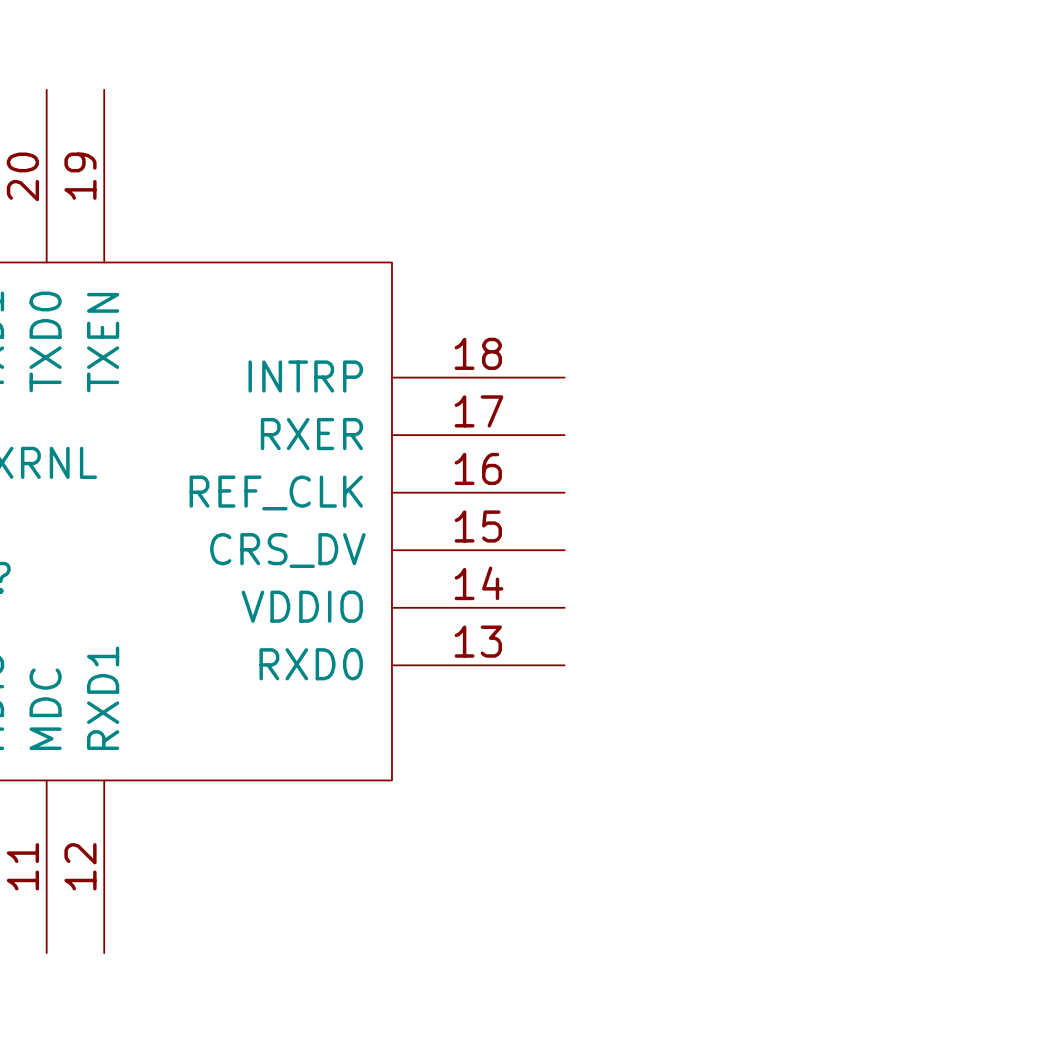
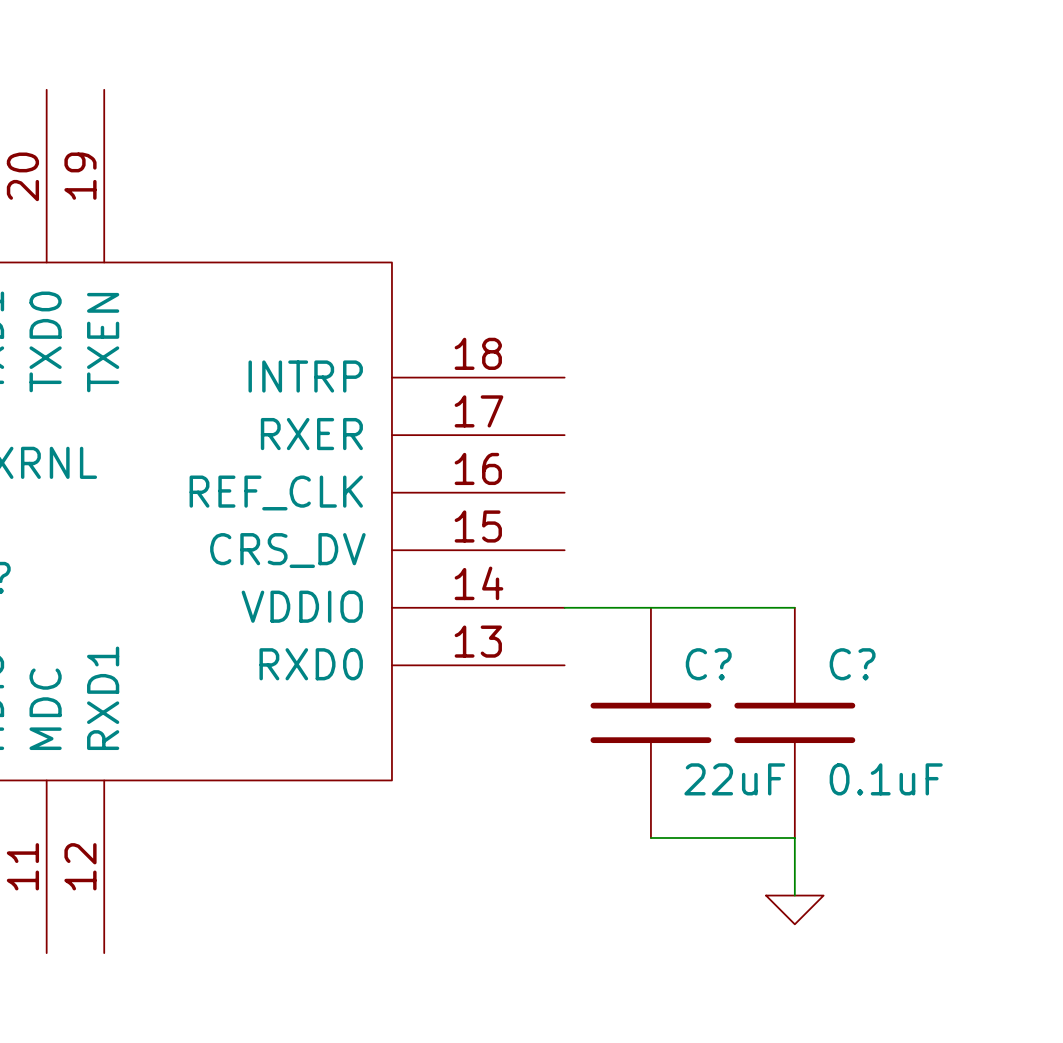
wire: none -> (564, 607) (794, 607)
C?: none -> 22uF (650, 722)
C?: none -> 0.1uF (794, 722)
wire: none -> (650, 837) (794, 837) (794, 895)
power symbol: none -> (794, 909)

